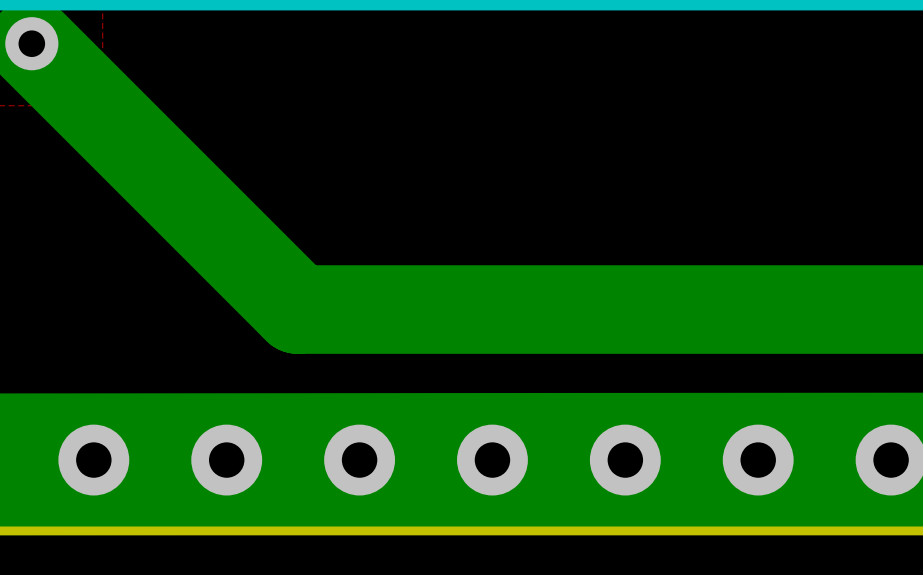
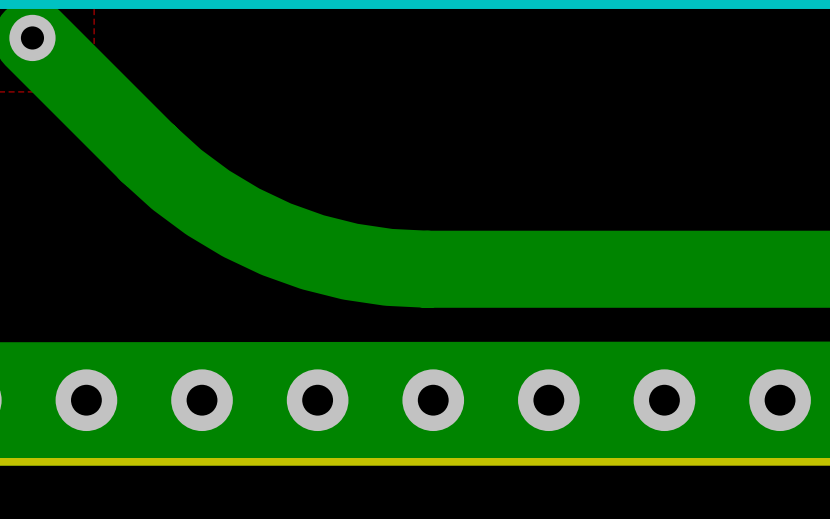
bottom track: (164, 176) (297, 309) (485, 309) -> (148, 153) (176, 179) (207, 202) (241, 222) (276, 239) (312, 252) (350, 261) (388, 267) (427, 269)

